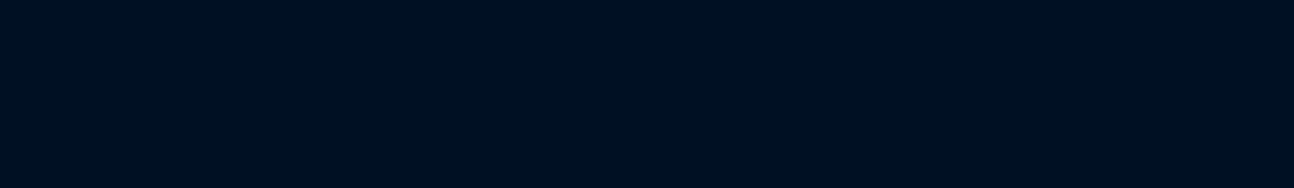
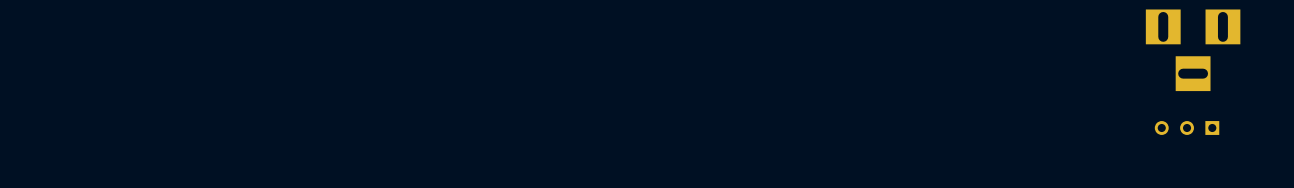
part: none -> (1193, 50)
part: none -> (1187, 127)

